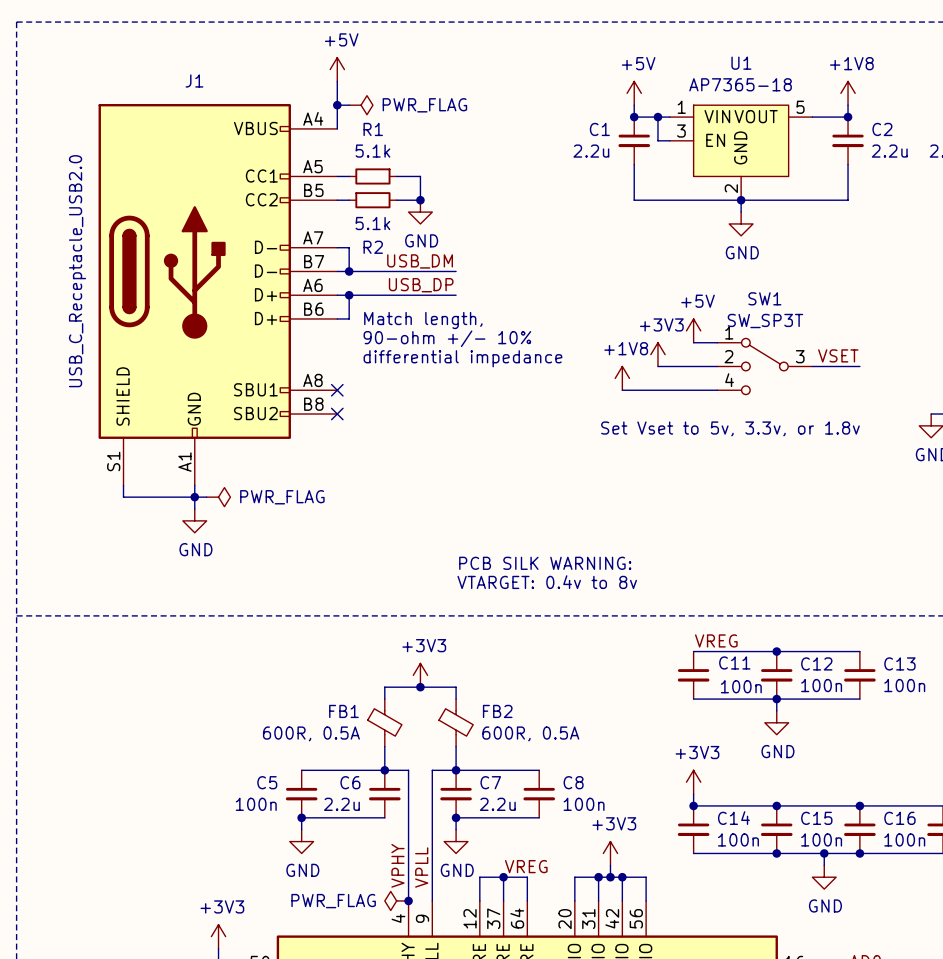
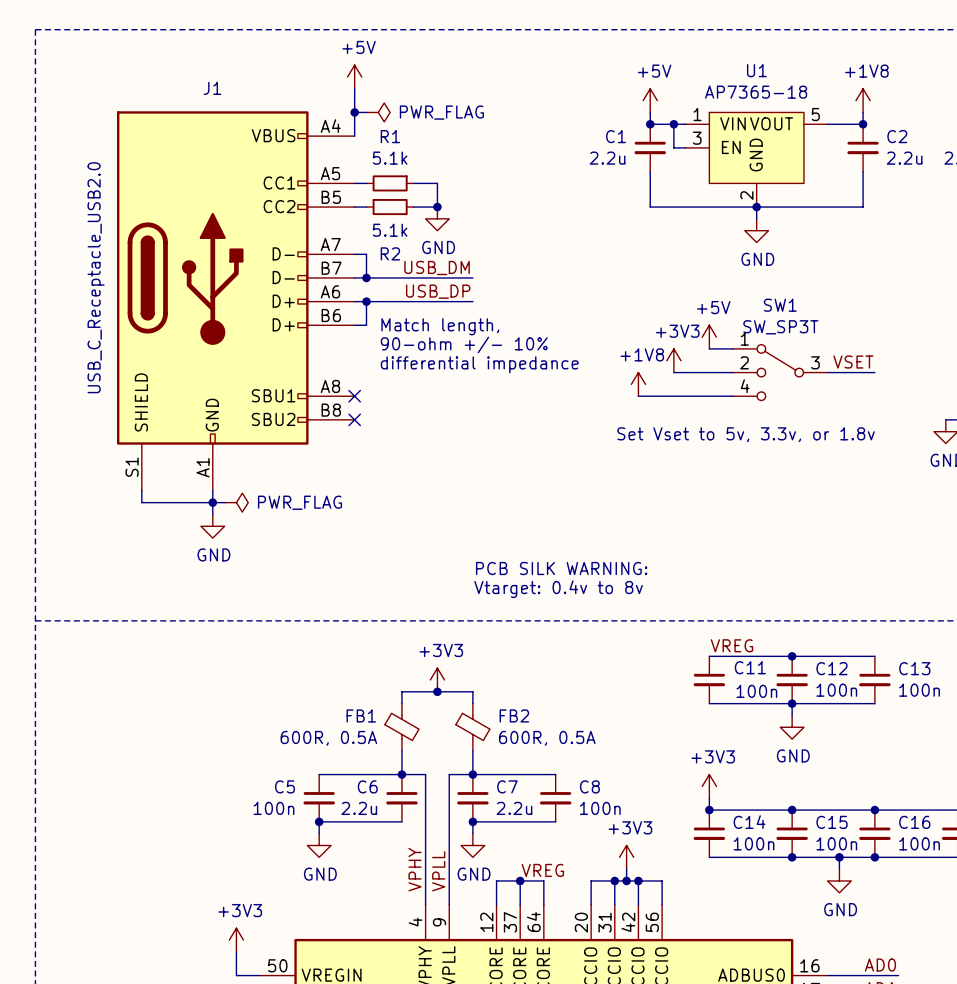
text: VTARGET: 0.4v to 8v (547, 582) -> Vtarget: 0.4v to 8v (558, 589)
power symbol: PWR_FLAG (396, 900) -> none
junction: (408, 900) -> none

